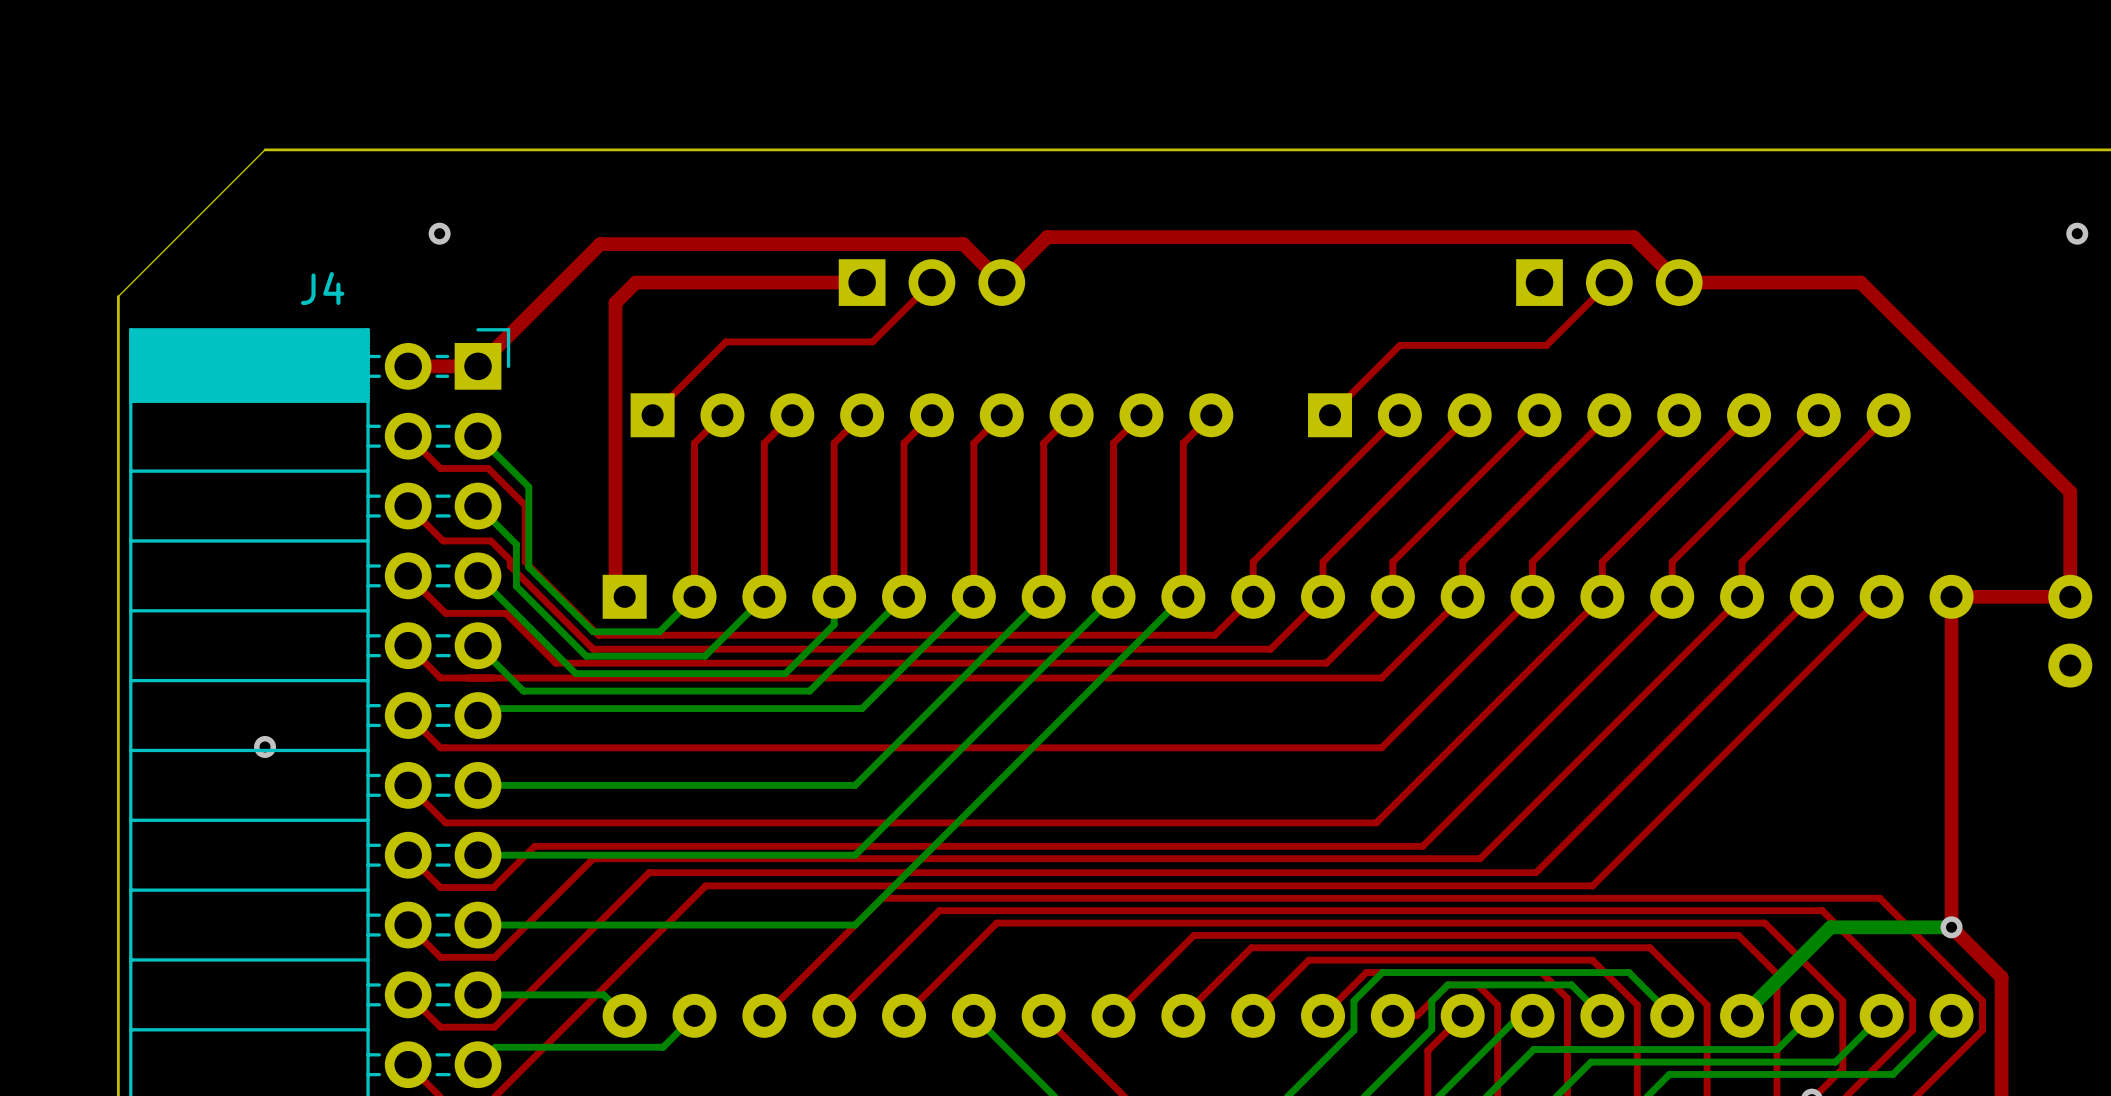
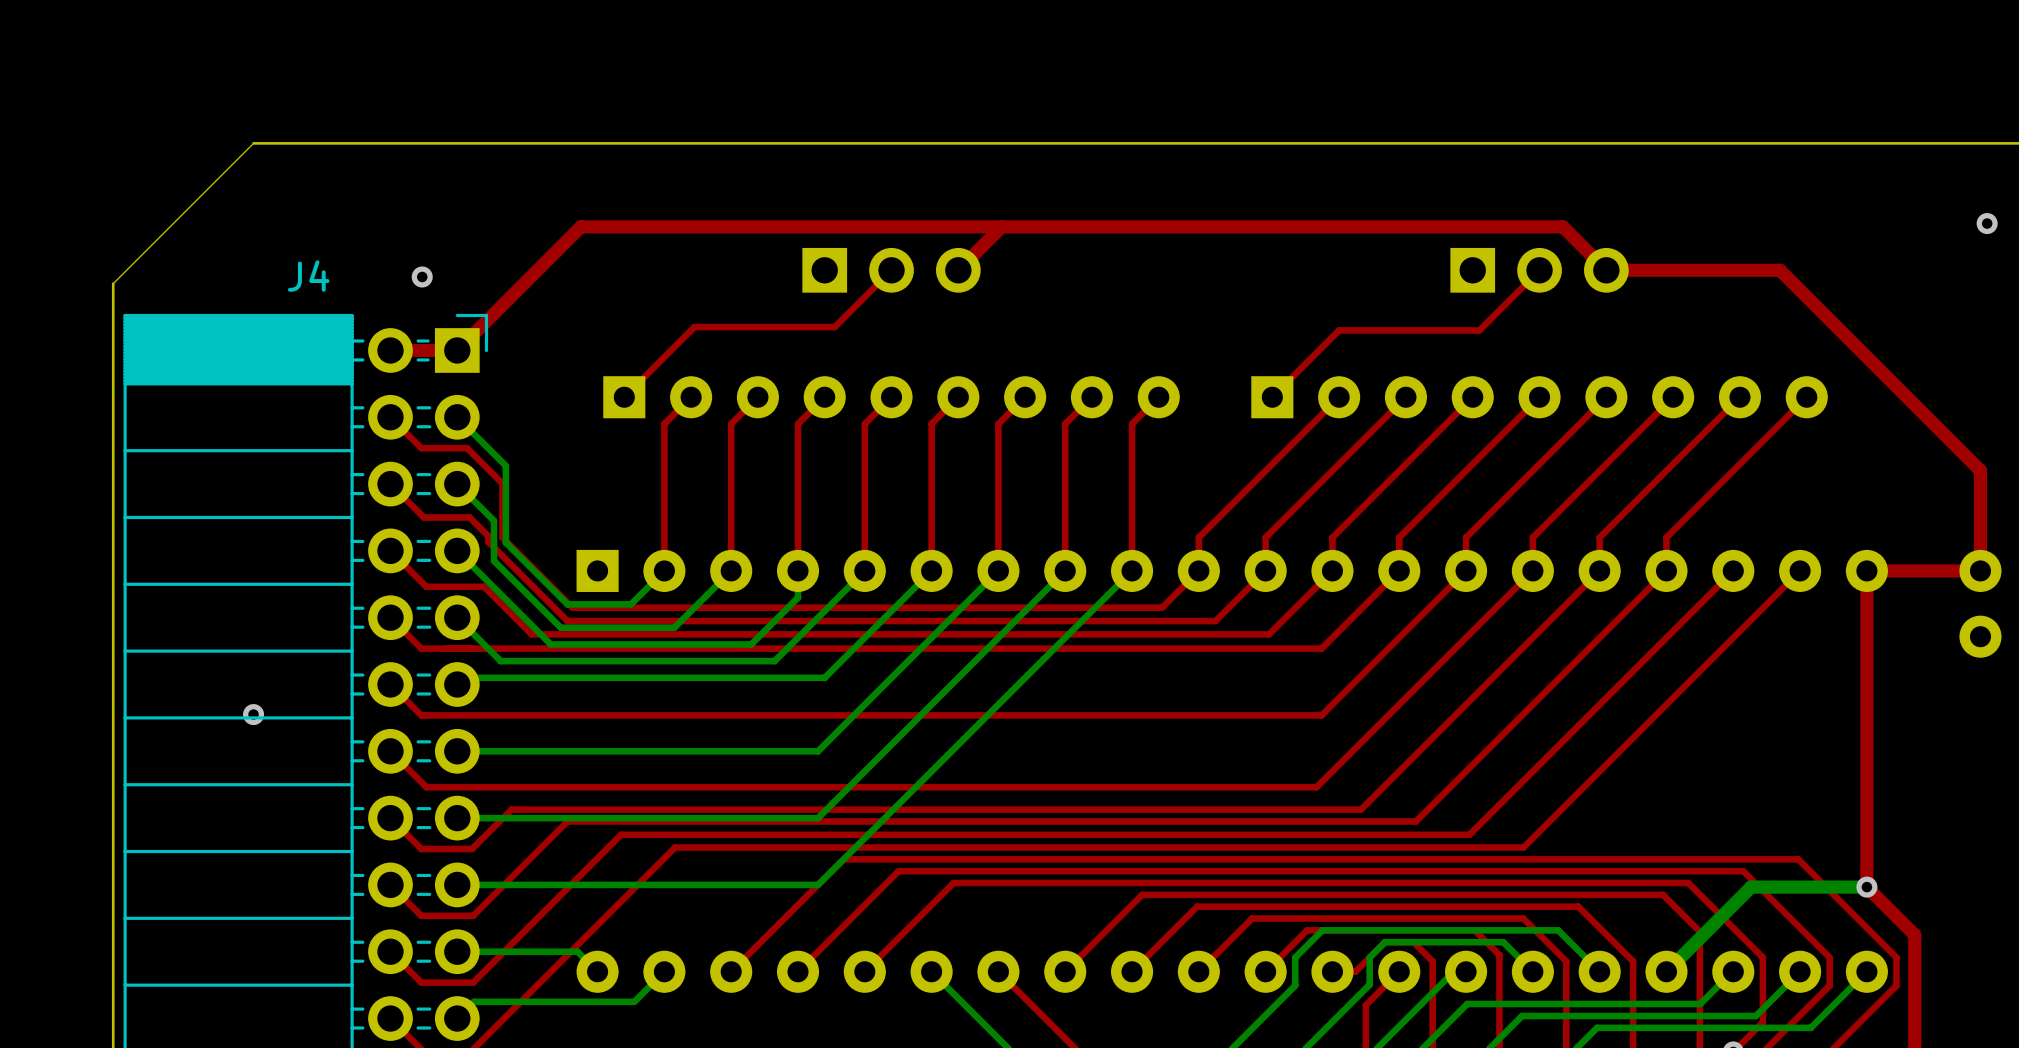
via position: (439, 233) -> (422, 276)
top track: (600, 244) (963, 244) (1001, 282) -> (574, 233) (580, 226) (1001, 226)
top track: (862, 282) (635, 282) (615, 302) (615, 587) (624, 596) -> none

